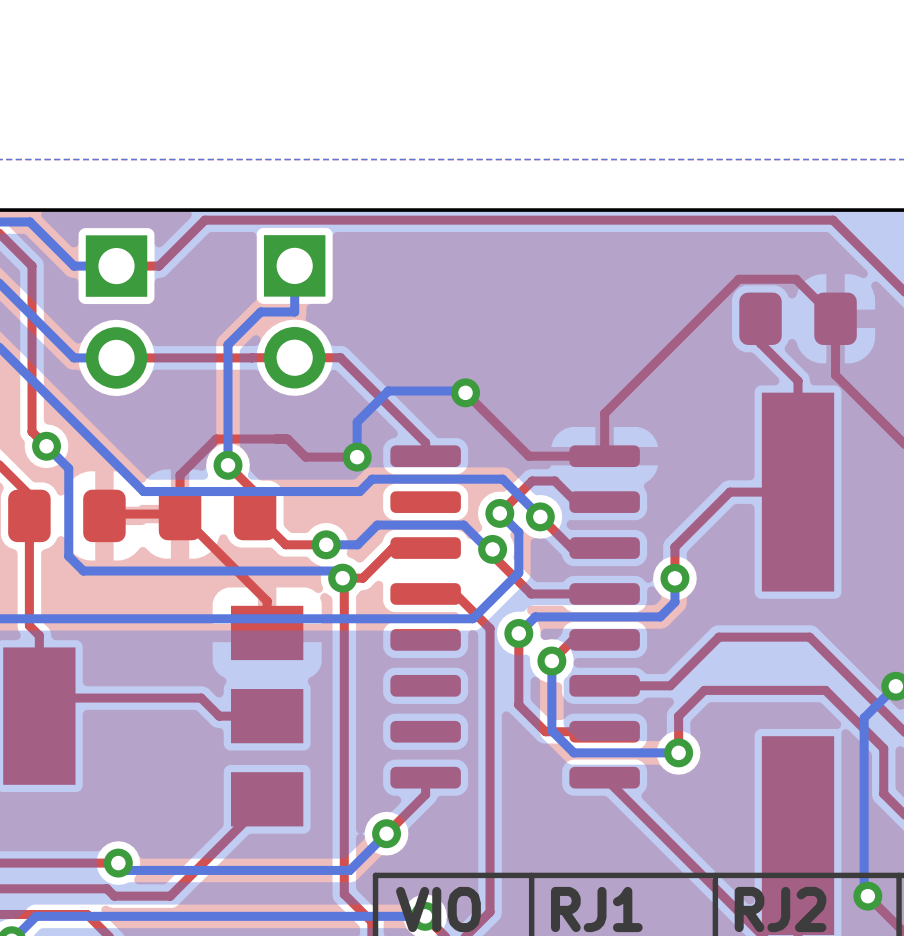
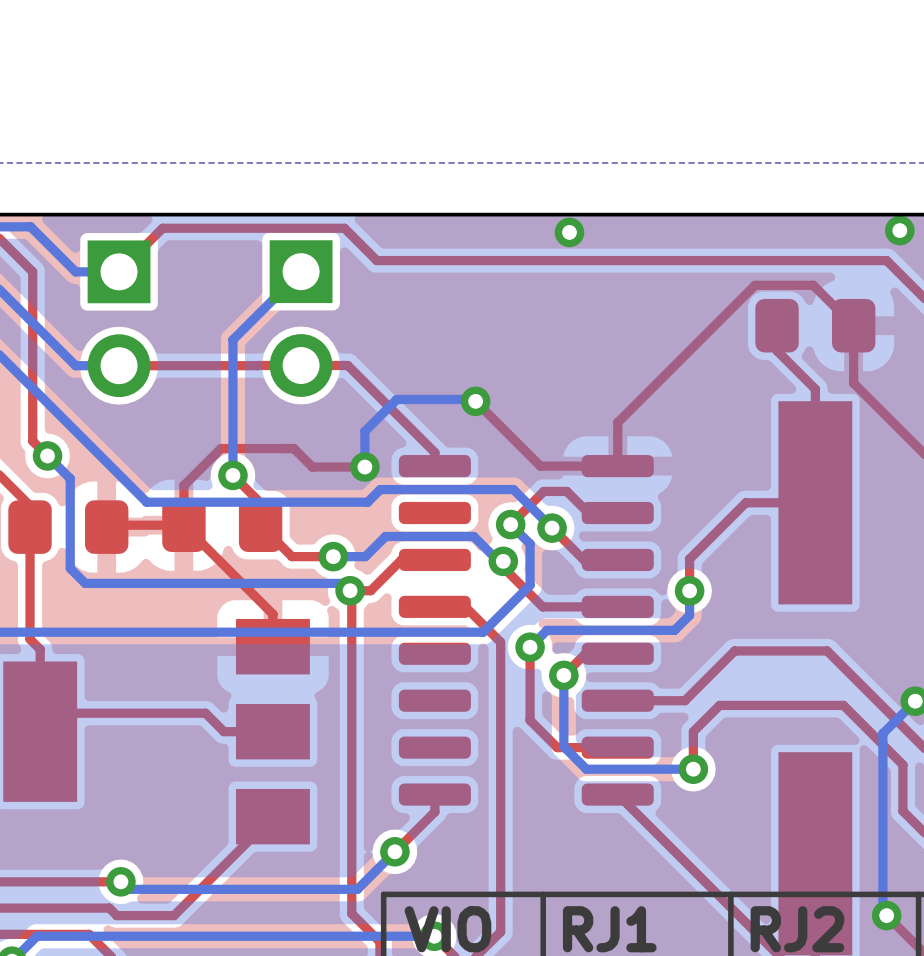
via: none -> (899, 230)
via: none -> (569, 232)
top track: (867, 255) (832, 220) (204, 220) (159, 266) (116, 266) -> (886, 260) (376, 260) (344, 228) (162, 228) (119, 271)
bottom track: (294, 265) (294, 311) (260, 311) (228, 344) -> (301, 271) (232, 339) (232, 352)

